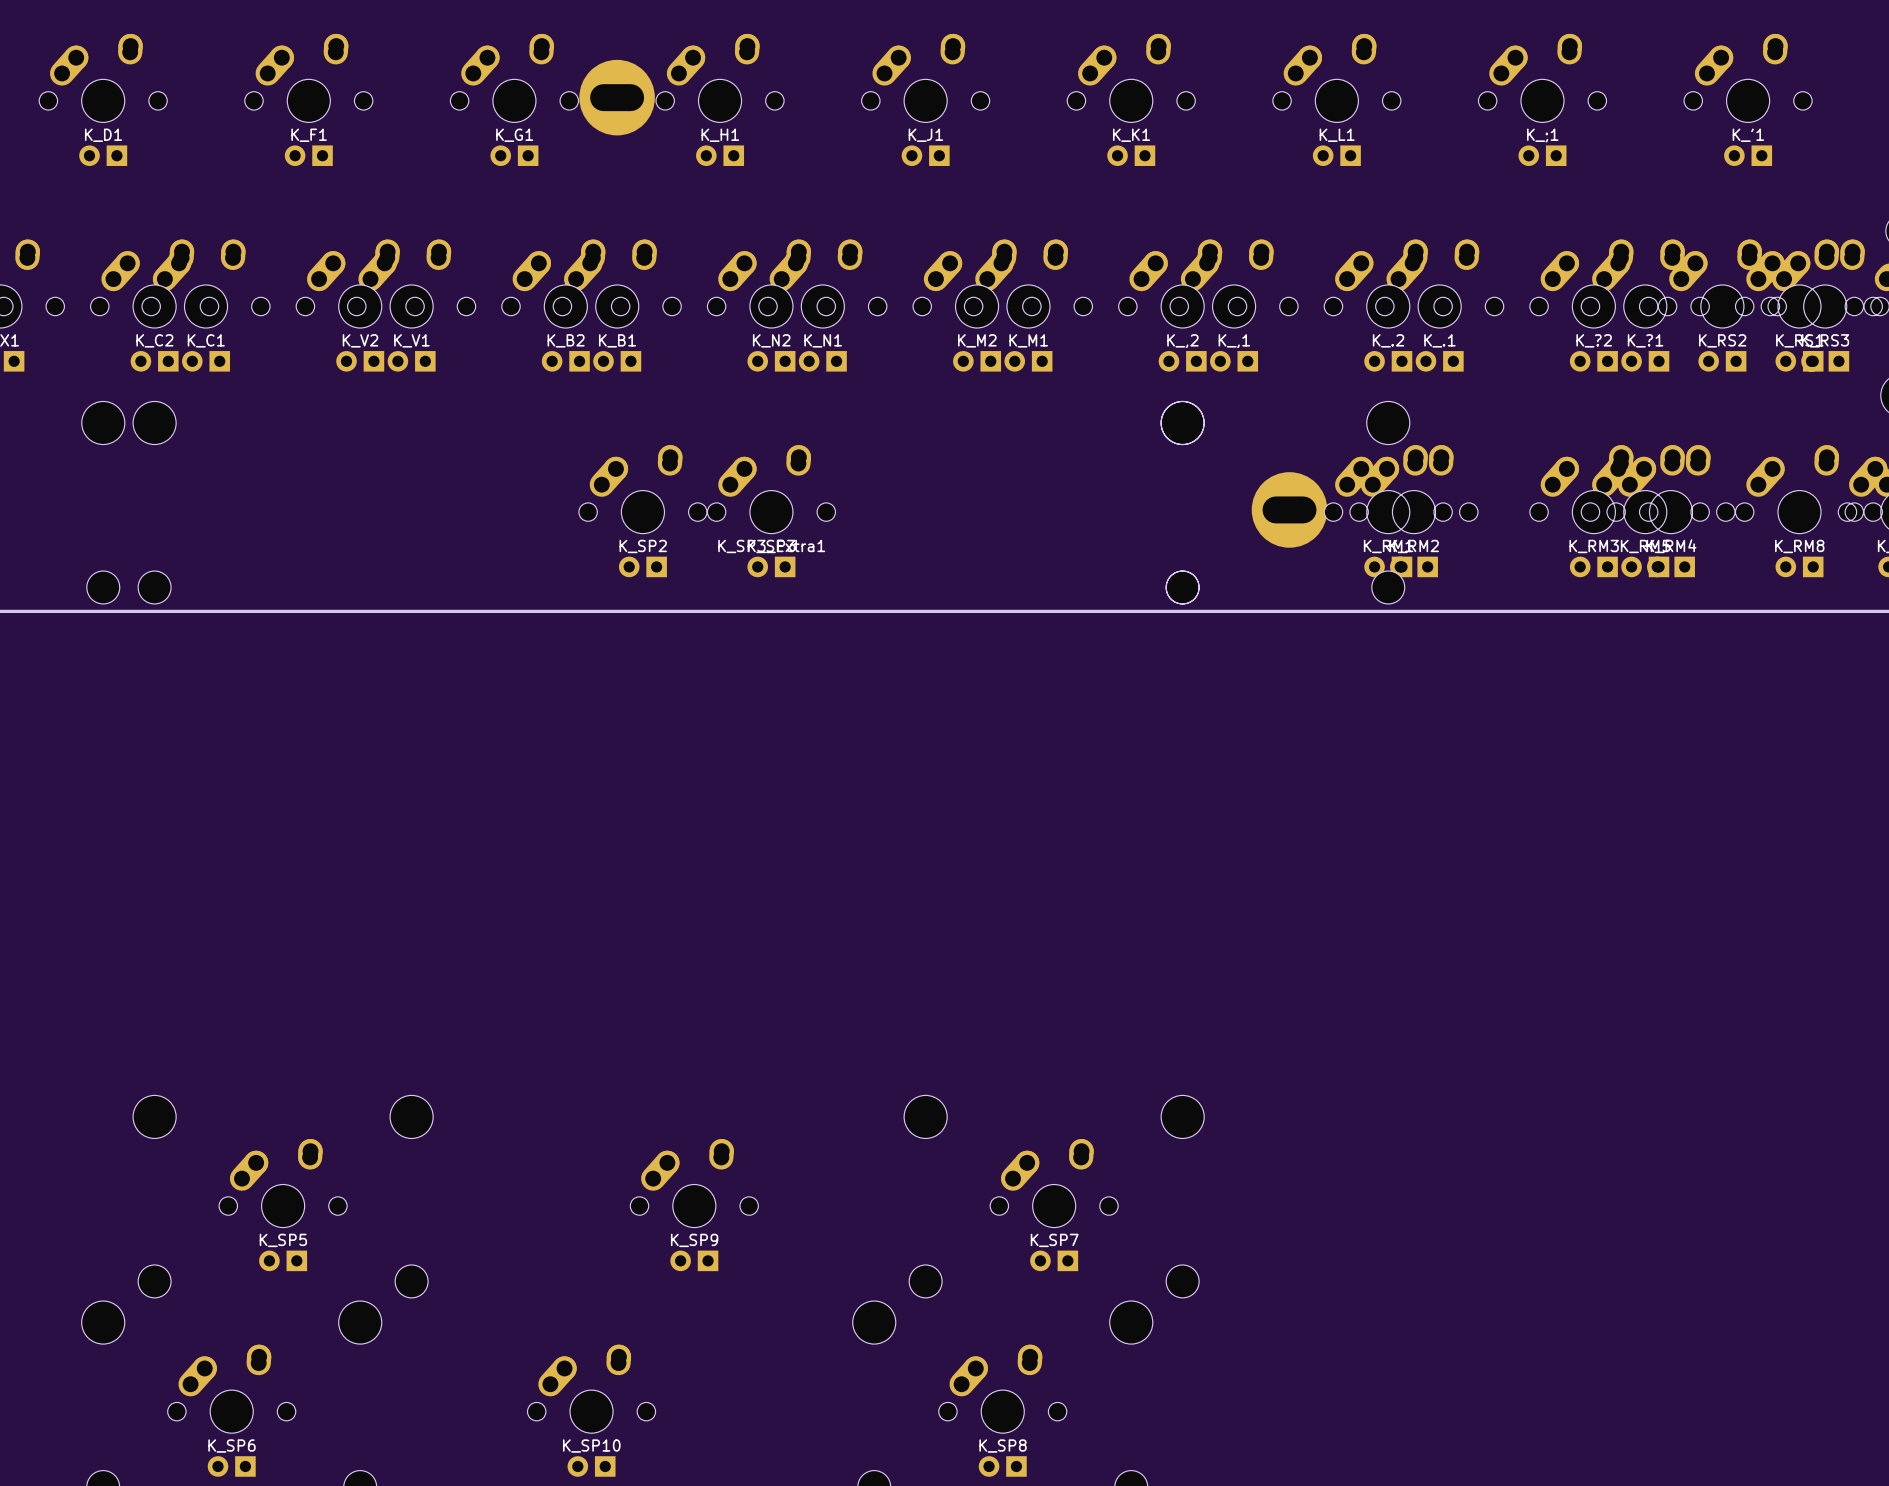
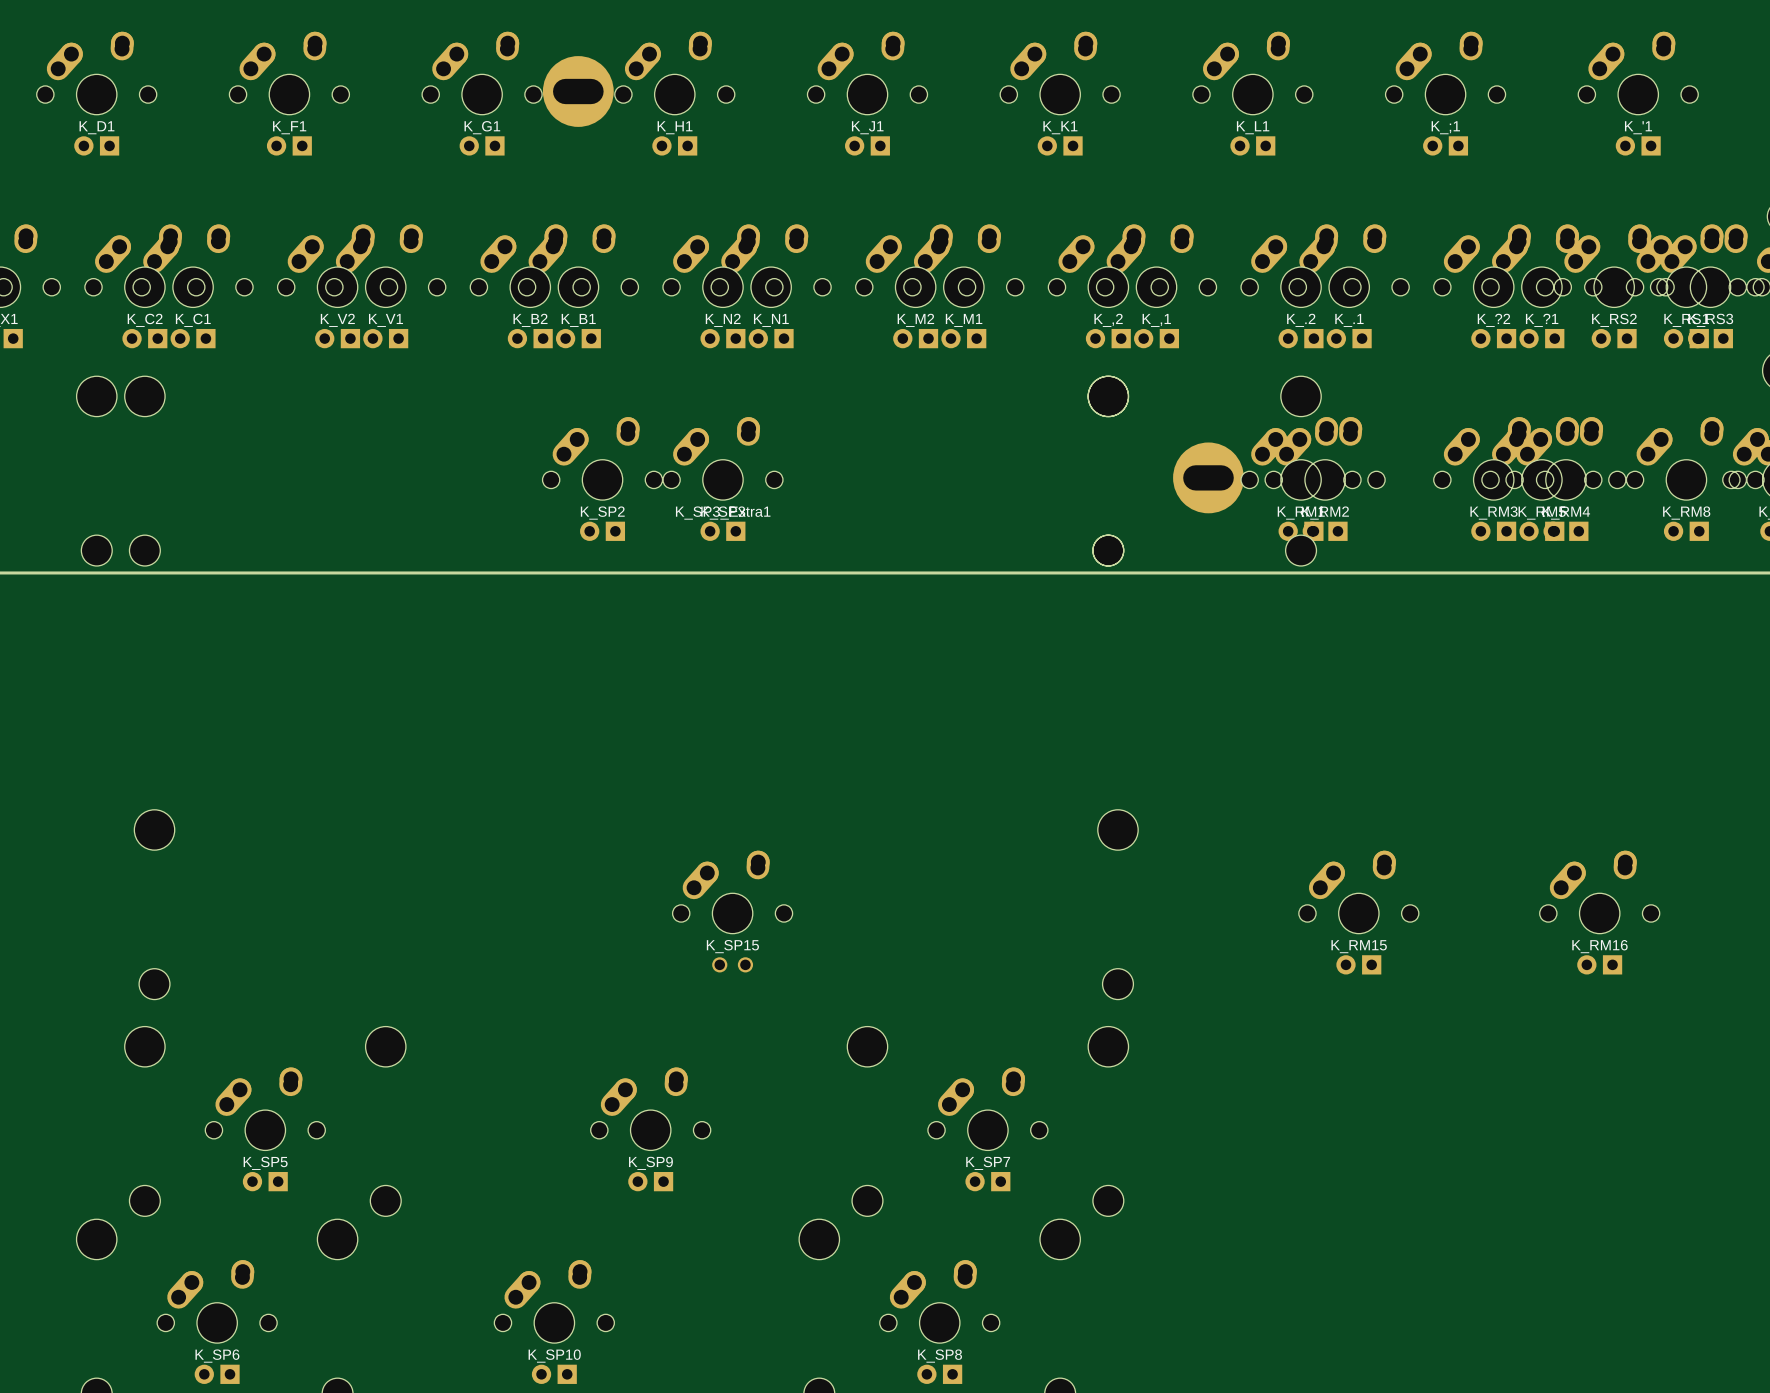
K_SP15: none -> (636, 904)
K_RM15: none -> (1358, 912)
K_RM16: none -> (1599, 912)

